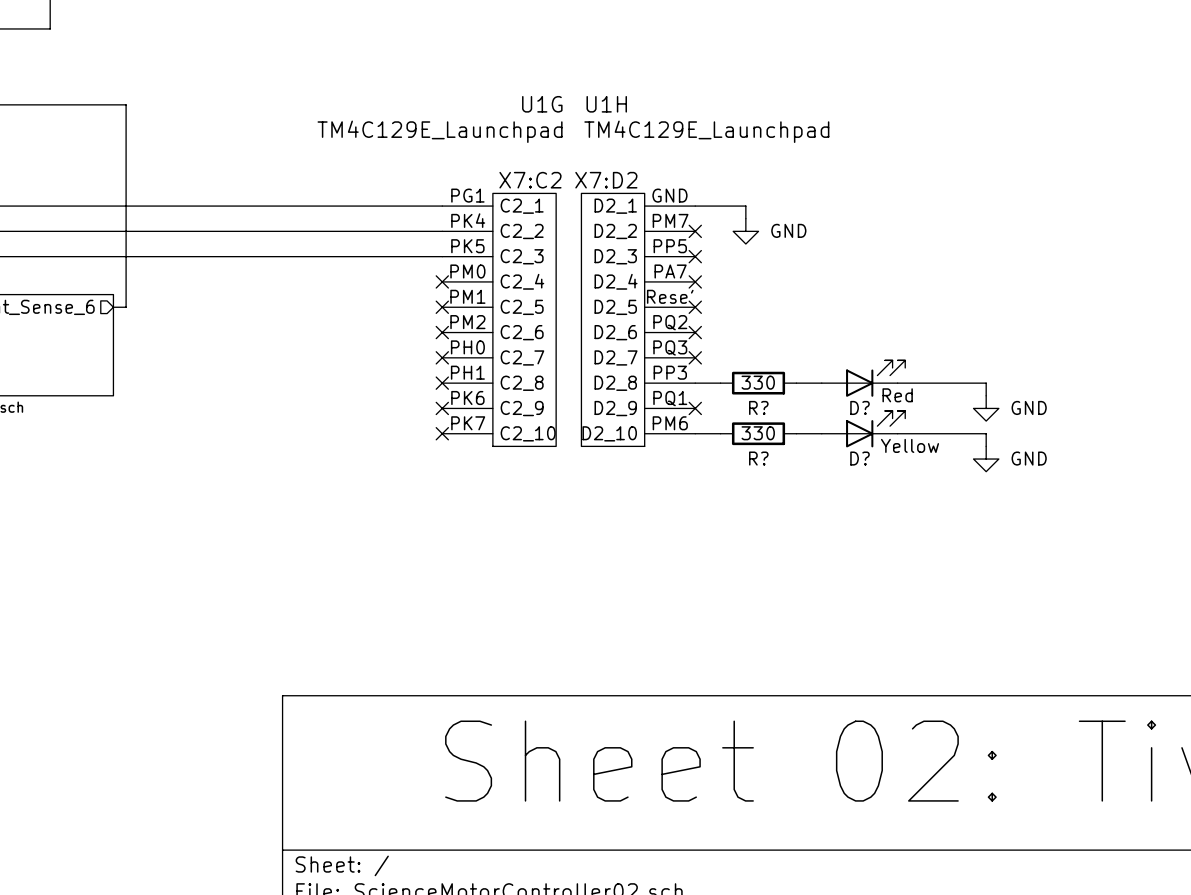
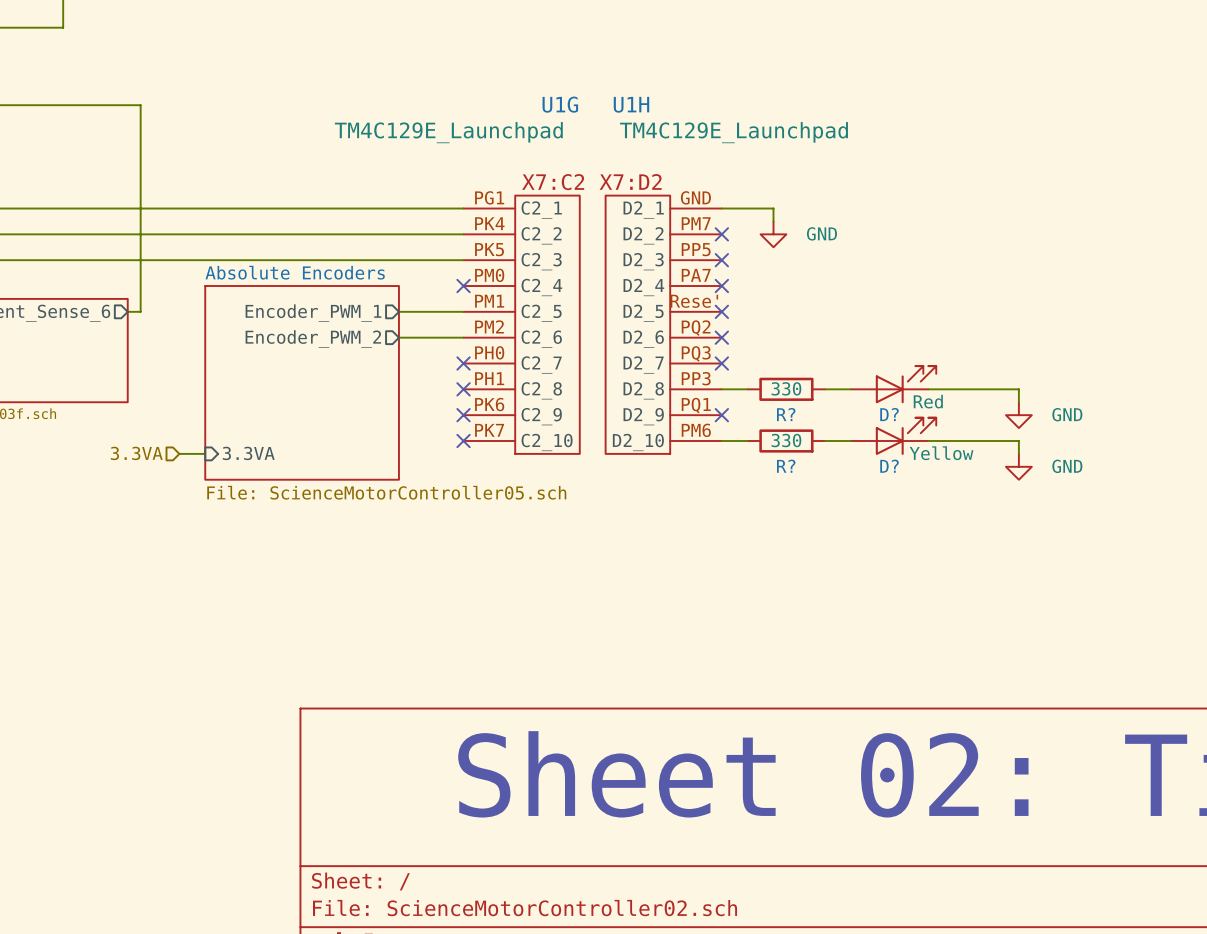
sheet pin: none -> Encoder_PWM_1 (313, 313)
wire: none -> (398, 311) (463, 311)
no-connect mark: (442, 307) -> none
sheet pin: none -> Encoder_PWM_2 (313, 339)
wire: none -> (398, 337) (463, 337)
no-connect mark: (442, 332) -> none
sheet Absolute Encoders: none -> File: ScienceMotorController05.sch (302, 382)
hierarchical label: none -> 3.3VA (136, 453)
sheet pin: none -> 3.3VA (248, 453)
wire: none -> (179, 453) (205, 453)

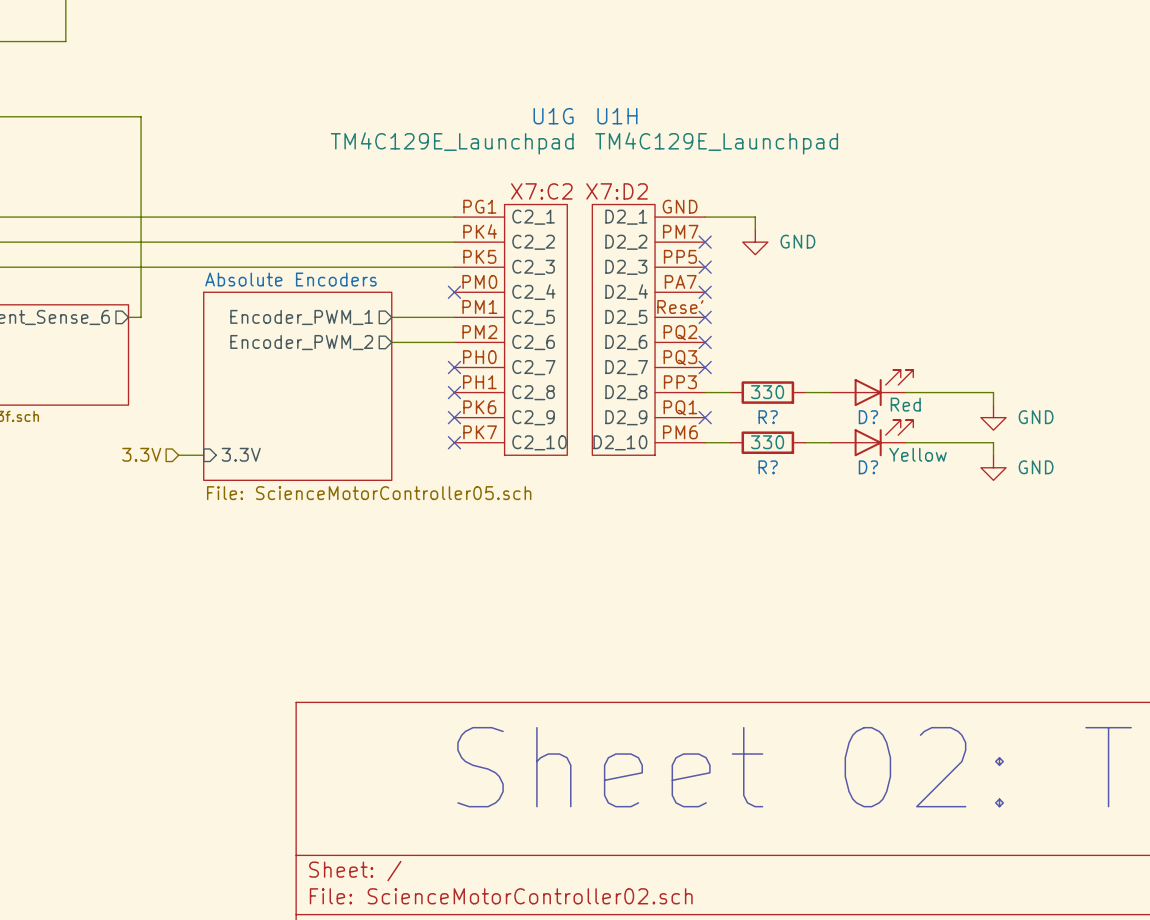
hierarchical label: 3.3VA (136, 453) -> 3.3V (141, 454)
sheet pin: 3.3VA (248, 453) -> 3.3V (241, 454)

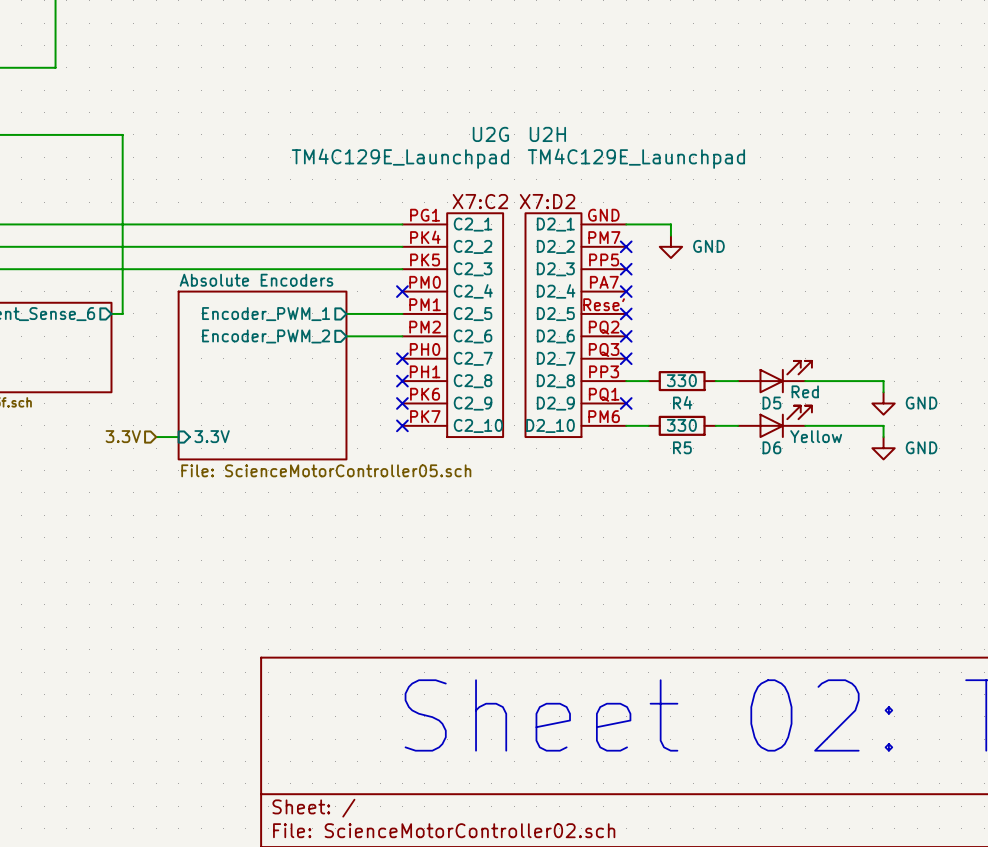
U1G name: U1G (553, 116) -> U2G (490, 134)
U1H name: U1H (617, 116) -> U2H (547, 134)
R? name: R? (768, 417) -> R4 (682, 402)
D? name: D? (868, 417) -> D5 (771, 403)
R? name: R? (768, 467) -> R5 (682, 447)
D? name: D? (868, 467) -> D6 (771, 447)

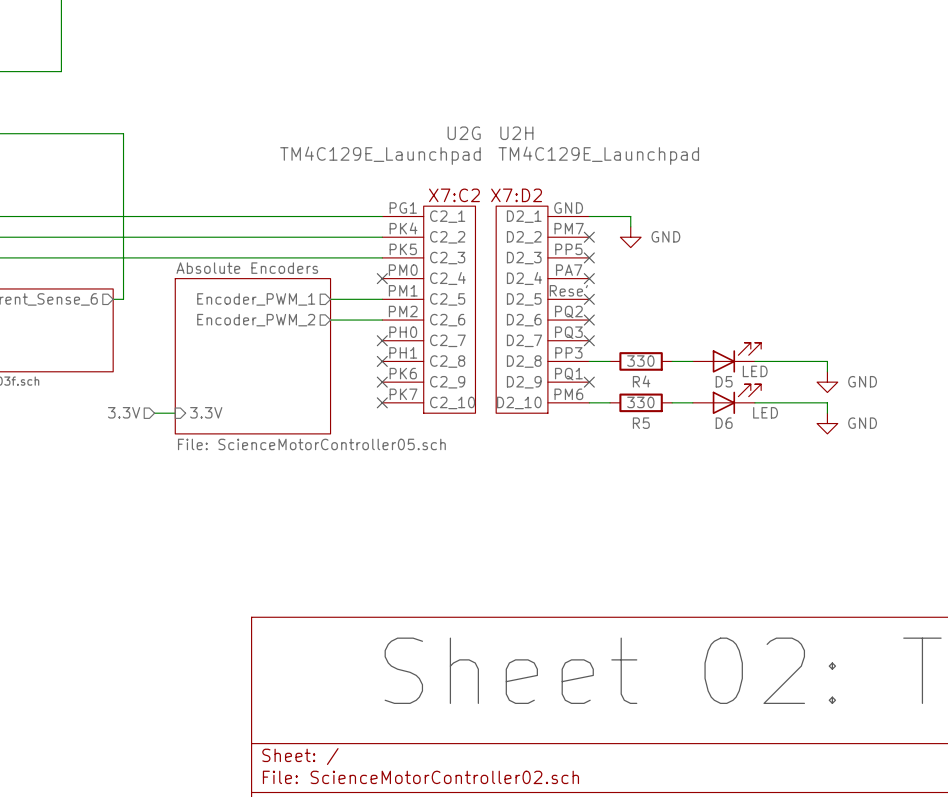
D5 value: Red (805, 391) -> LED (755, 371)
D6 value: Yellow (816, 436) -> LED (765, 412)

